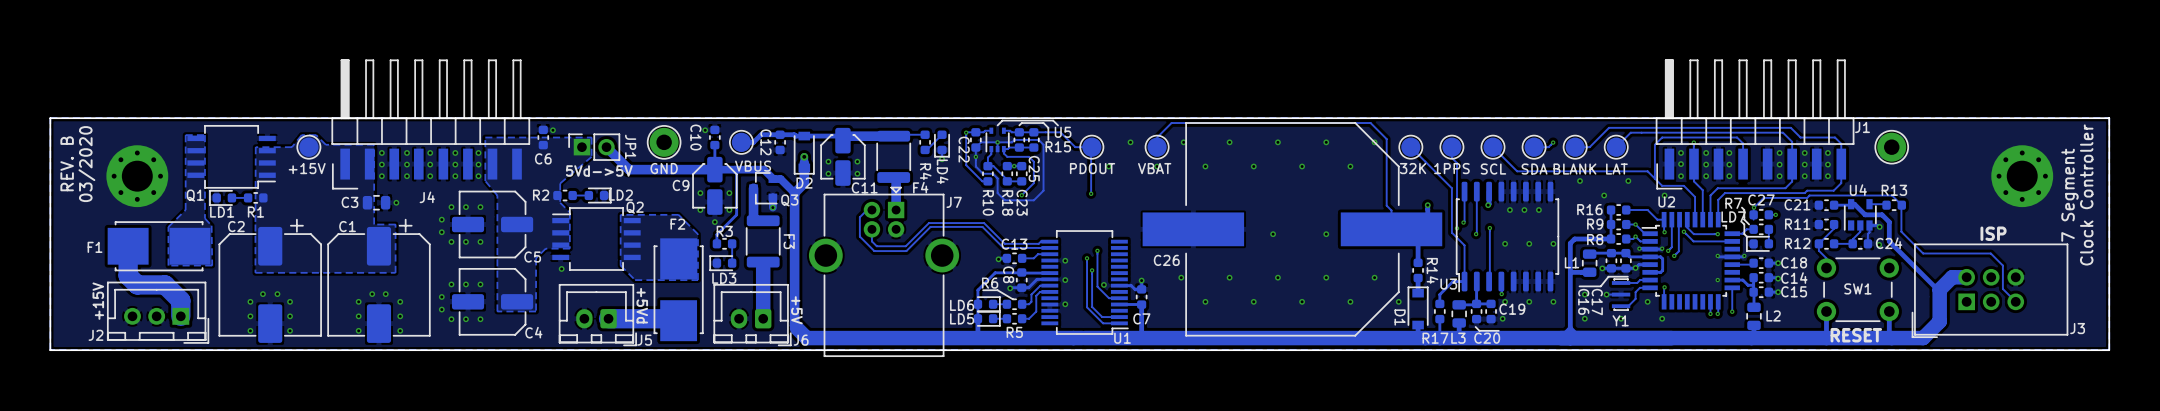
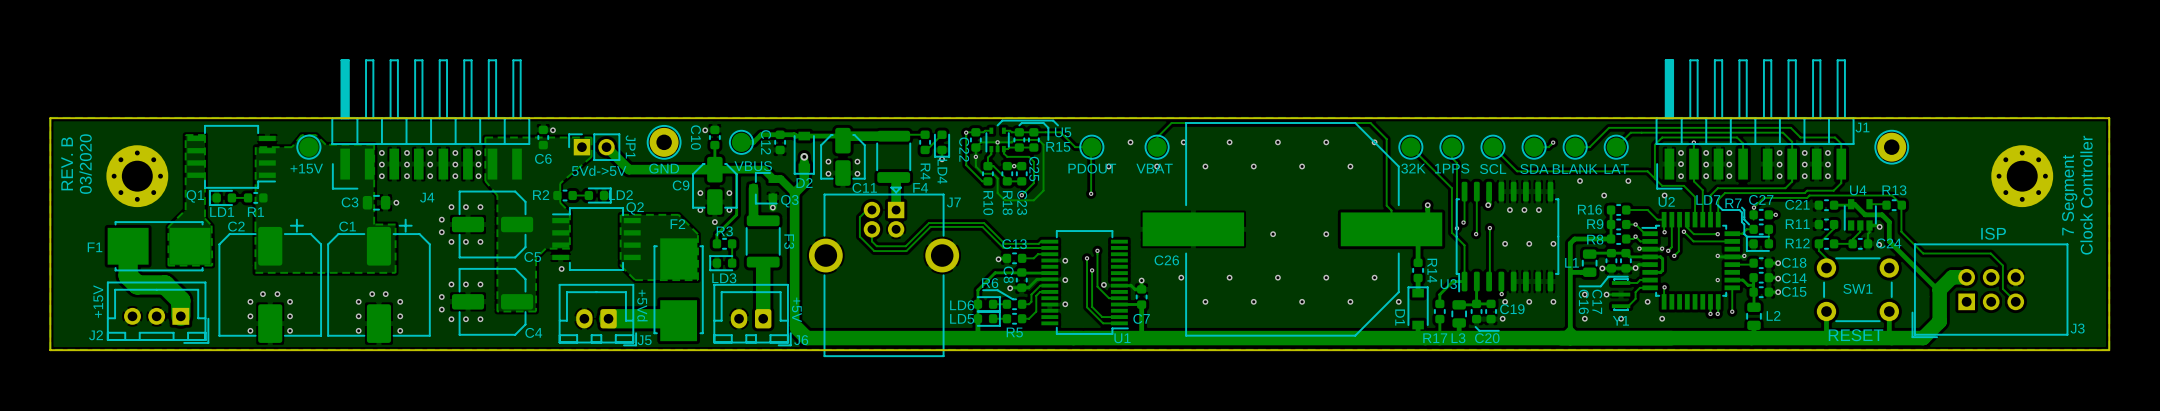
line: none -> (1717, 205) (1722, 210) (1739, 210) (1741, 212) (1741, 222)
LD7 name position: LD7 (1733, 216) -> LD7 (1708, 199)

